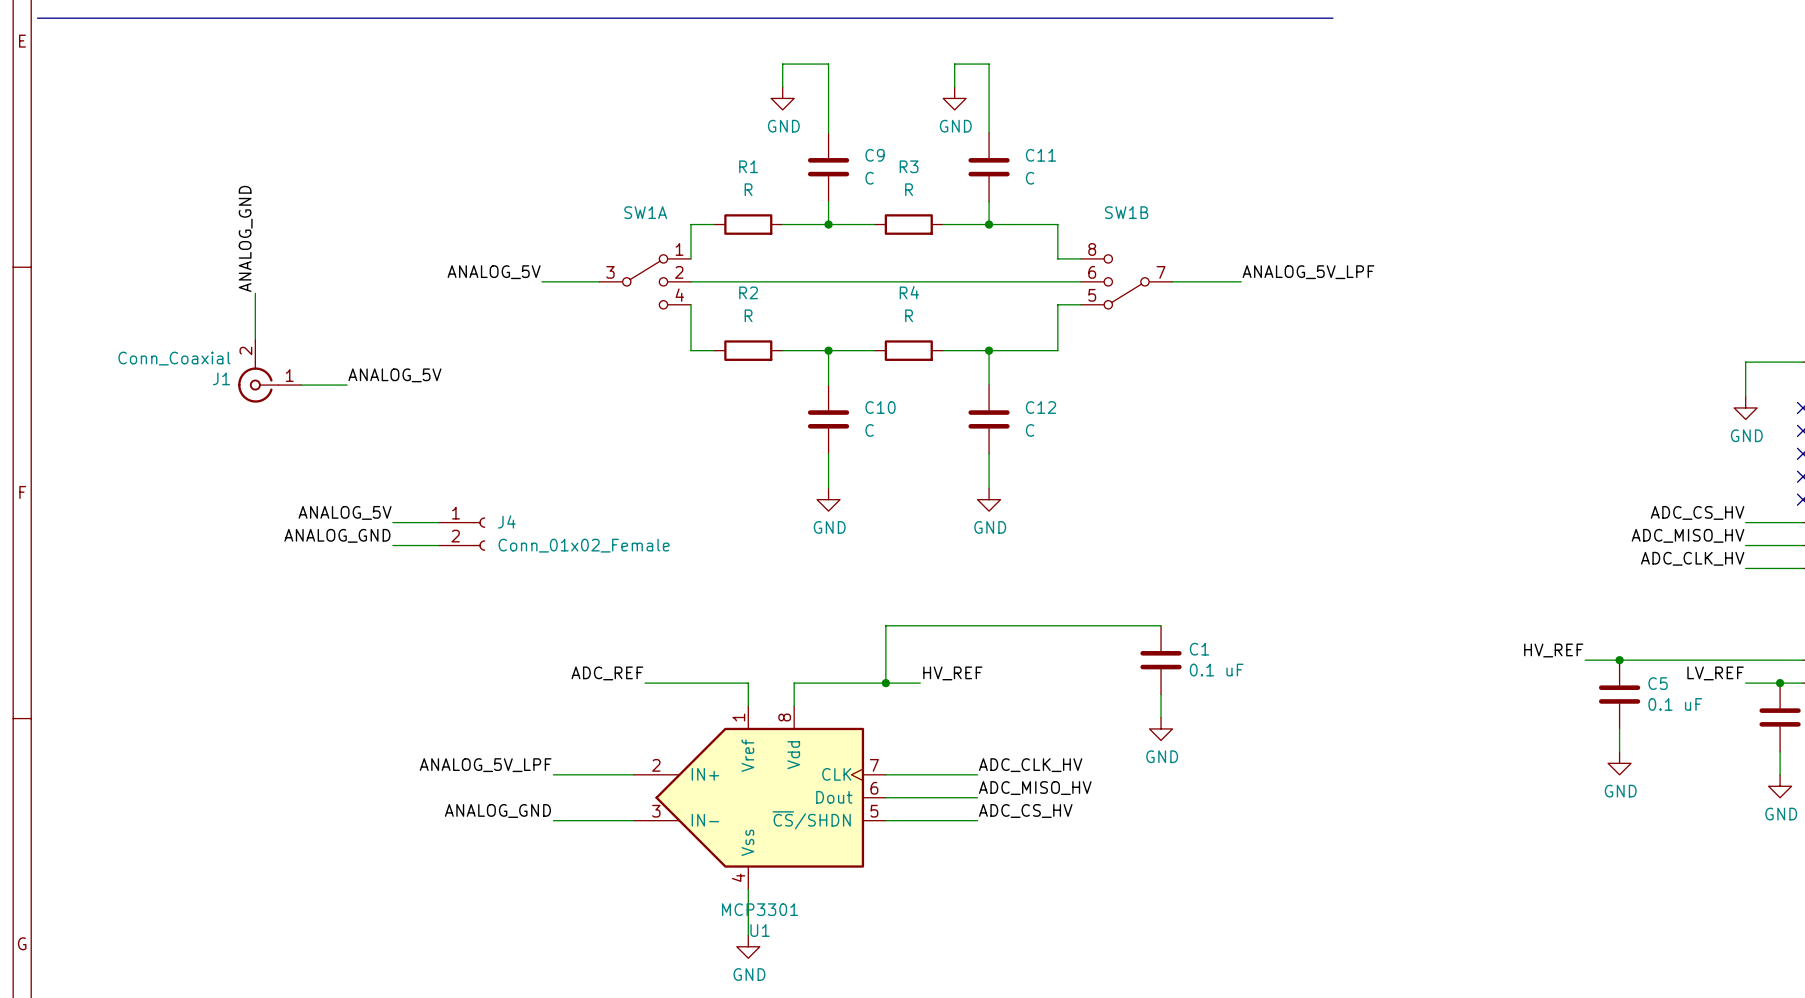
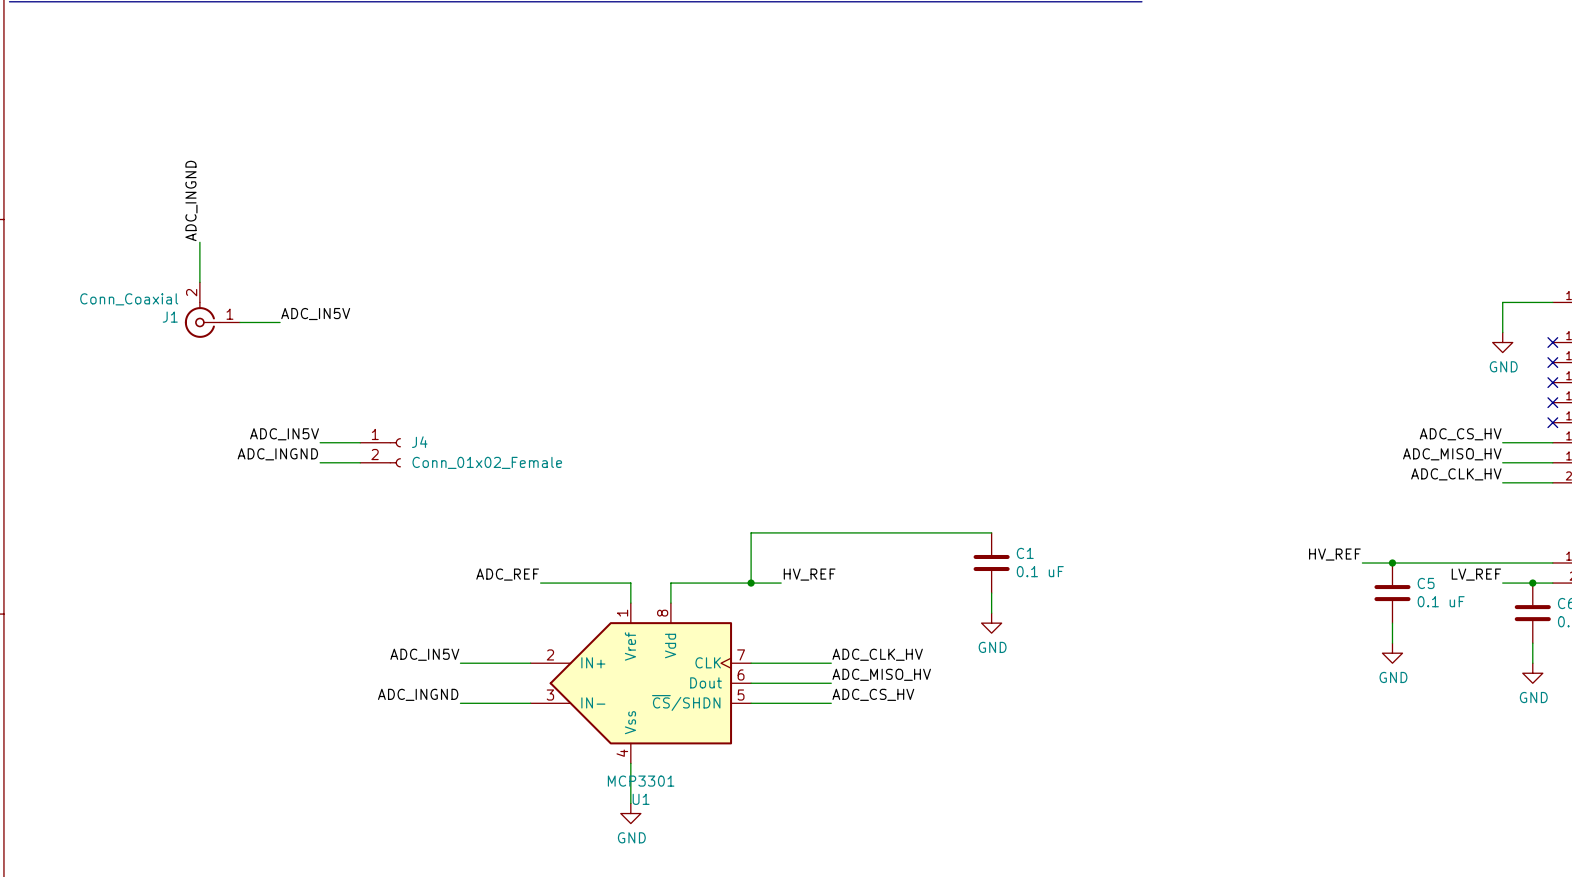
wire: (782, 86) (782, 64) (828, 64) (828, 132) -> none
wire: (954, 86) (954, 64) (989, 64) (989, 132) -> none
power symbol: GND (782, 98) -> none
power symbol: GND (954, 98) -> none
C9: C (828, 167) -> none
C11: C (989, 167) -> none
wire: (828, 201) (828, 224) -> none
wire: (989, 201) (989, 224) -> none
wire: (713, 224) (690, 224) (690, 258) -> none
R1: R (748, 224) -> none
wire: (782, 224) (874, 224) -> none
junction: (828, 224) -> none
R3: R (908, 224) -> none
wire: (943, 224) (1057, 224) (1057, 258) (1080, 258) -> none
junction: (989, 224) -> none
label: ANALOG_GND (245, 238) -> ADC_INGND (191, 200)
label: ANALOG_5V (494, 272) -> none
label: ANALOG_5V_LPF (1308, 272) -> none
wire: (541, 281) (599, 281) -> none
SW1A: (645, 281) -> none
wire: (690, 281) (1080, 281) -> none
SW1B: (1126, 281) -> none
wire: (1172, 281) (1241, 281) -> none
wire: (690, 304) (690, 350) (713, 350) -> none
wire: (1080, 304) (1057, 304) (1057, 350) (943, 350) -> none
R2: R (748, 350) -> none
wire: (782, 350) (874, 350) -> none
wire: (828, 350) (828, 385) -> none
junction: (828, 350) -> none
R4: R (908, 350) -> none
wire: (989, 350) (989, 385) -> none
junction: (989, 350) -> none
label: ANALOG_5V (394, 375) -> ADC_IN5V (315, 314)
C10: C (828, 419) -> none
C12: C (989, 419) -> none
wire: (828, 453) (828, 488) -> none
wire: (989, 453) (989, 488) -> none
power symbol: GND (828, 499) -> none
power symbol: GND (989, 499) -> none
label: ANALOG_5V (345, 512) -> ADC_IN5V (284, 434)
label: ANALOG_GND (337, 535) -> ADC_INGND (277, 454)
label: ANALOG_5V_LPF (485, 765) -> ADC_IN5V (424, 654)
label: ANALOG_GND (497, 810) -> ADC_INGND (418, 694)

